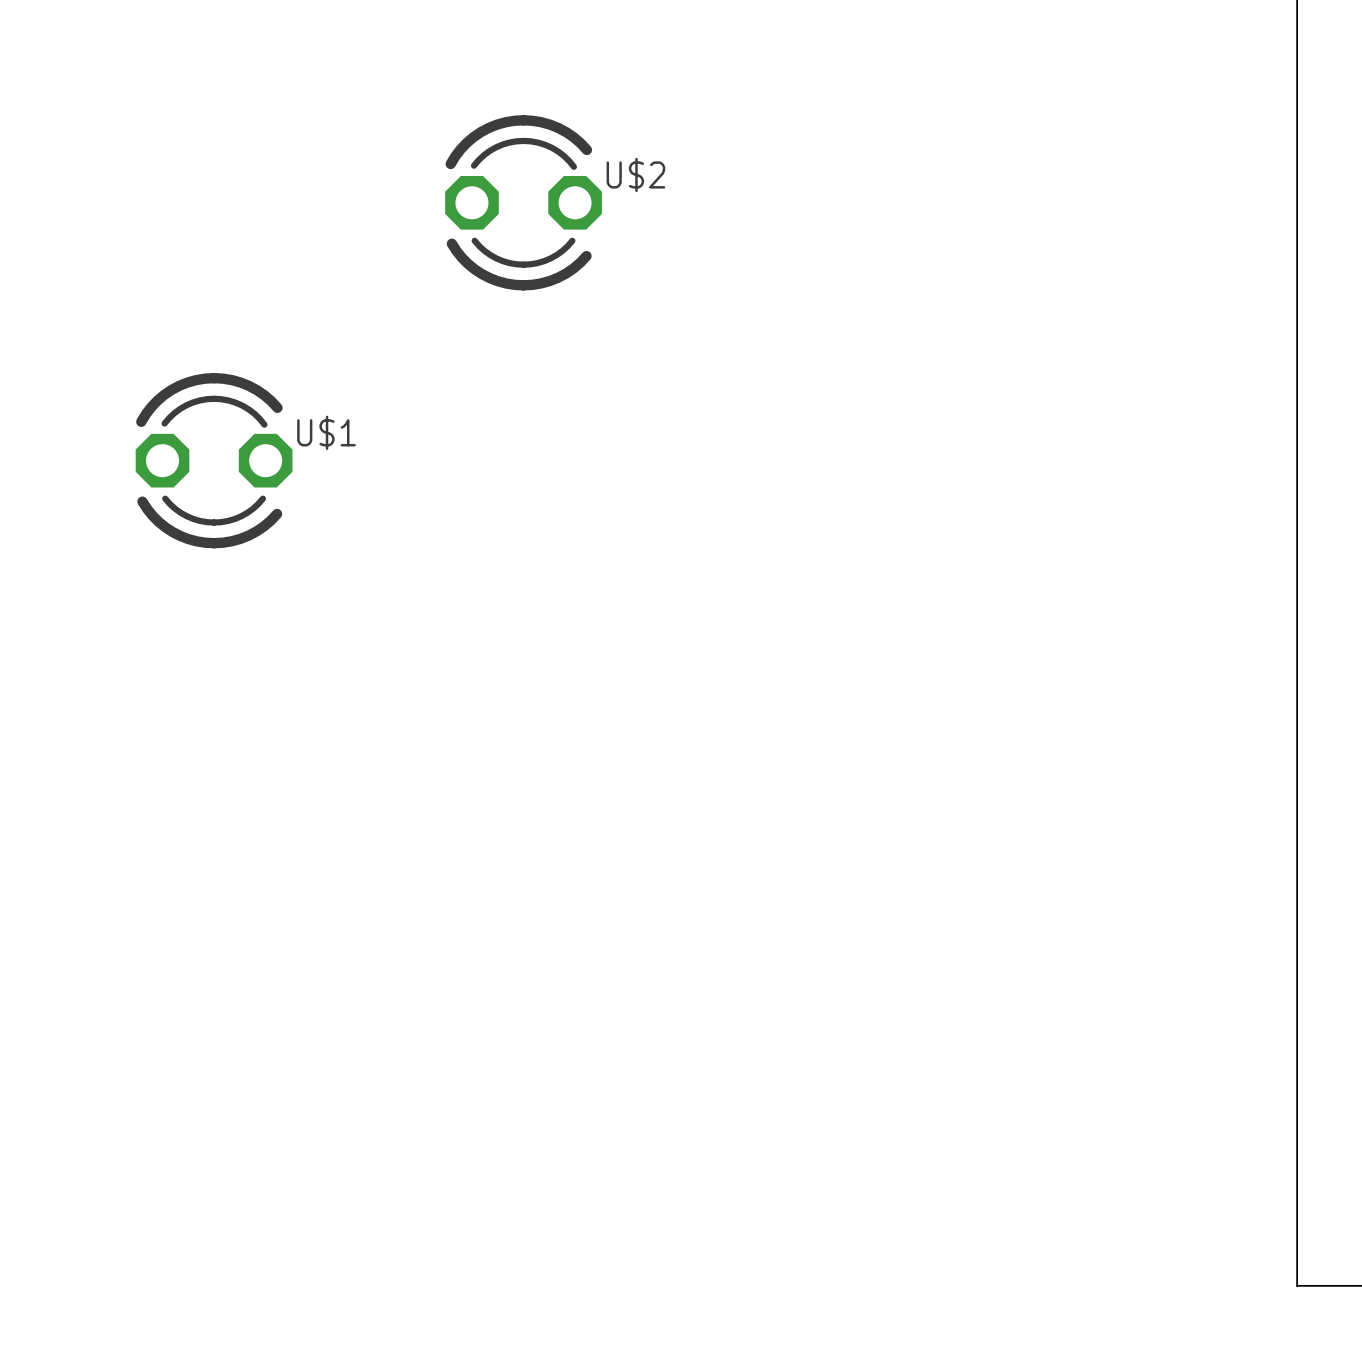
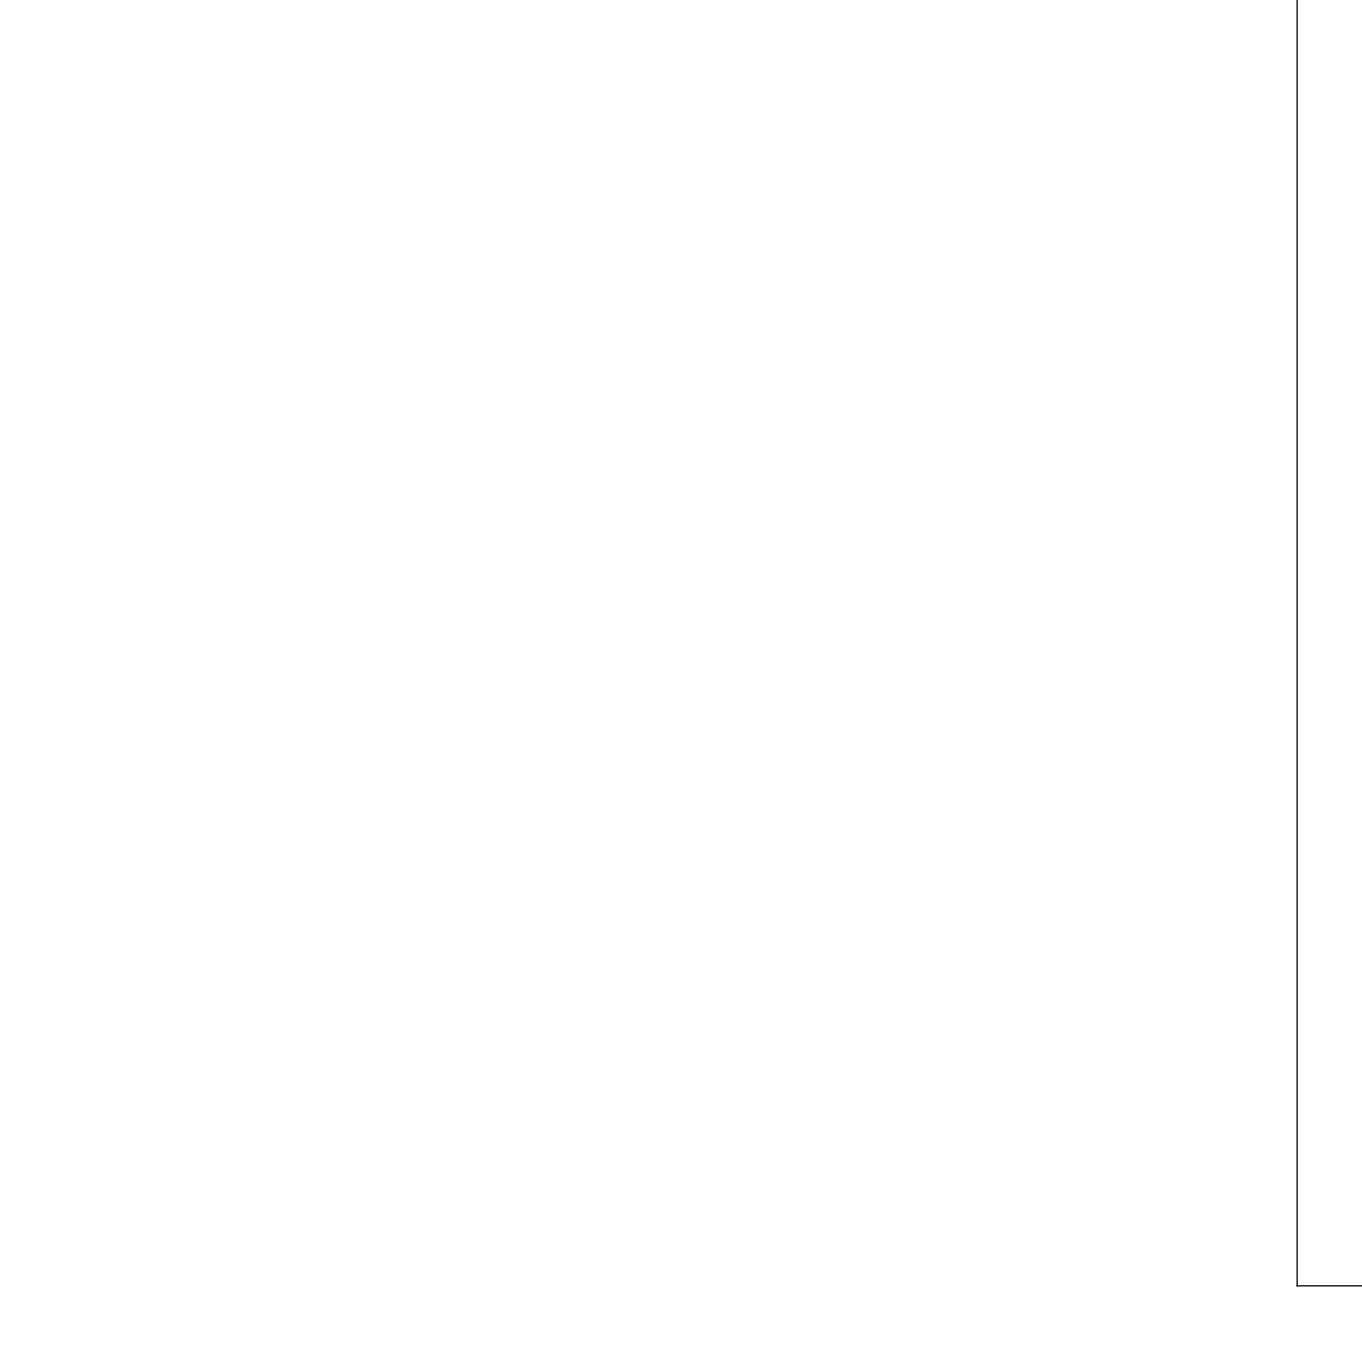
U$2: (523, 202) -> none
U$1: (214, 460) -> none

